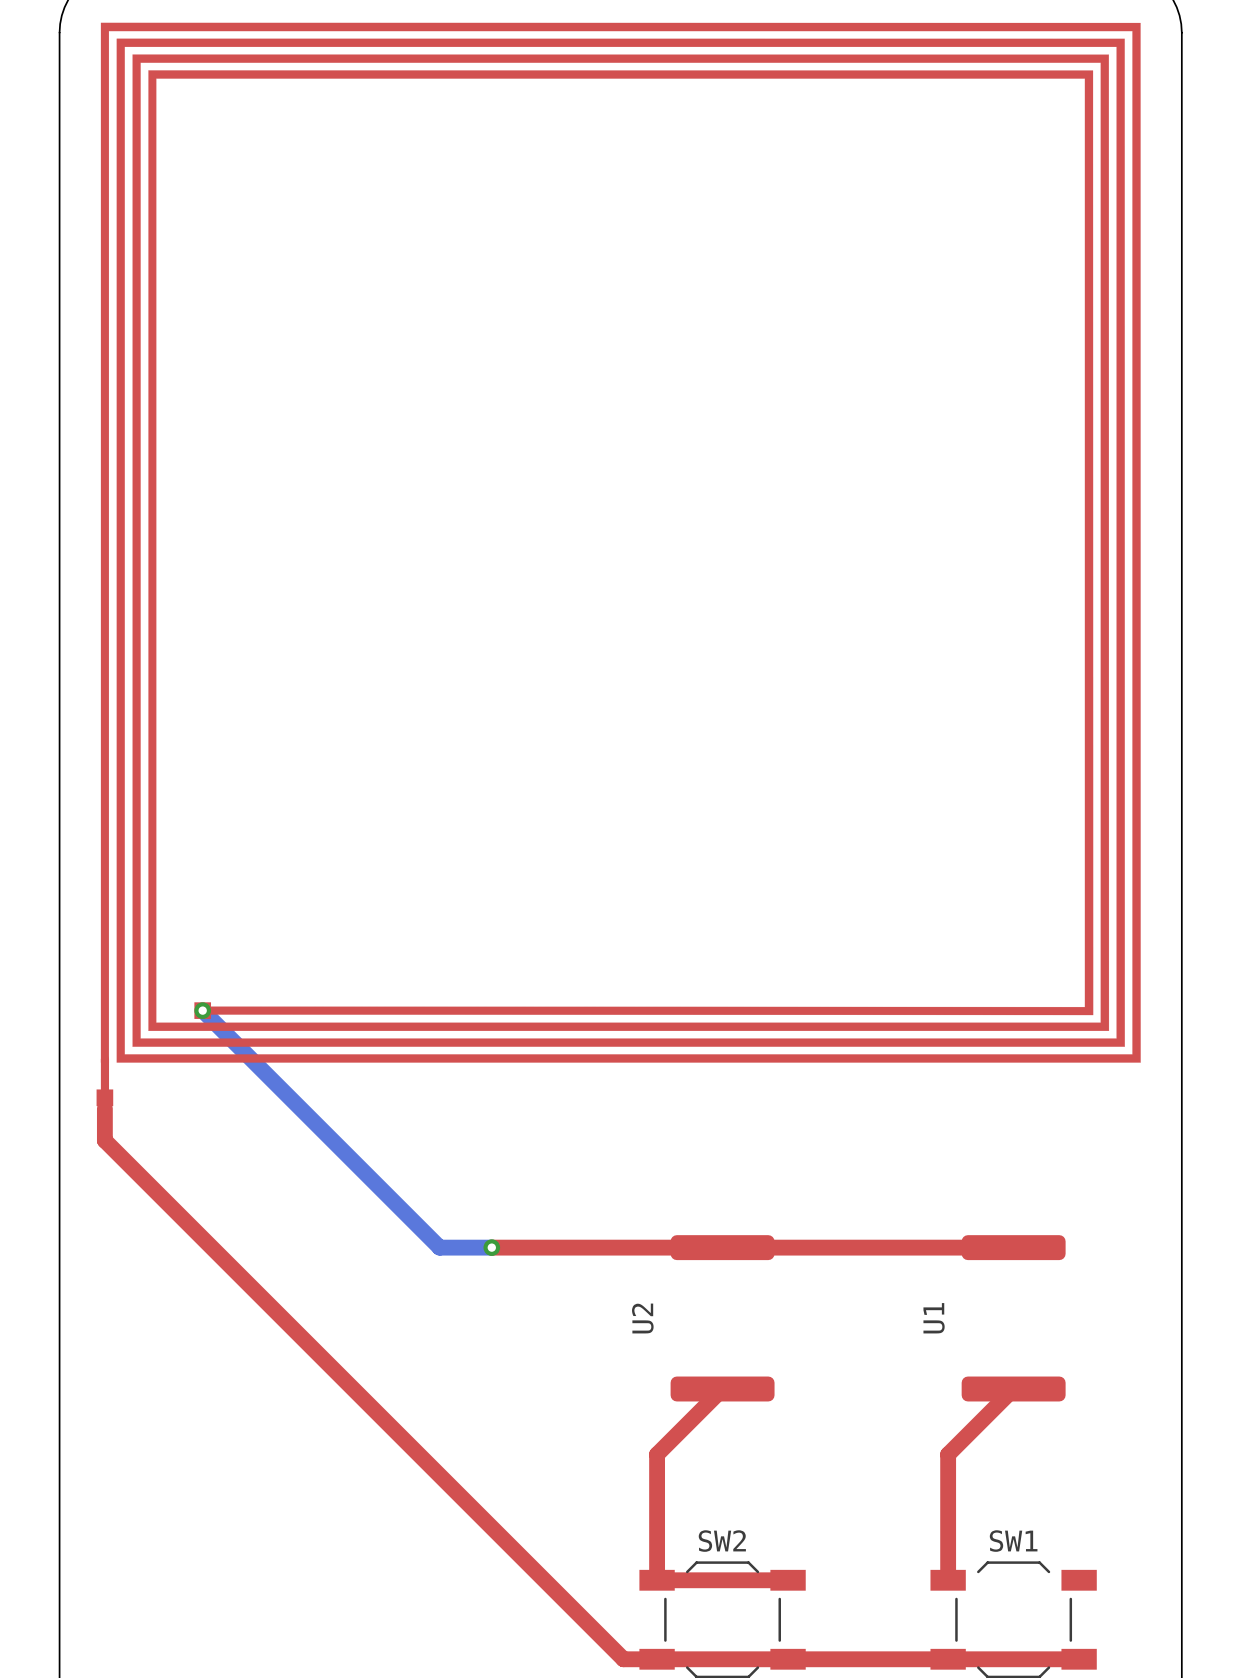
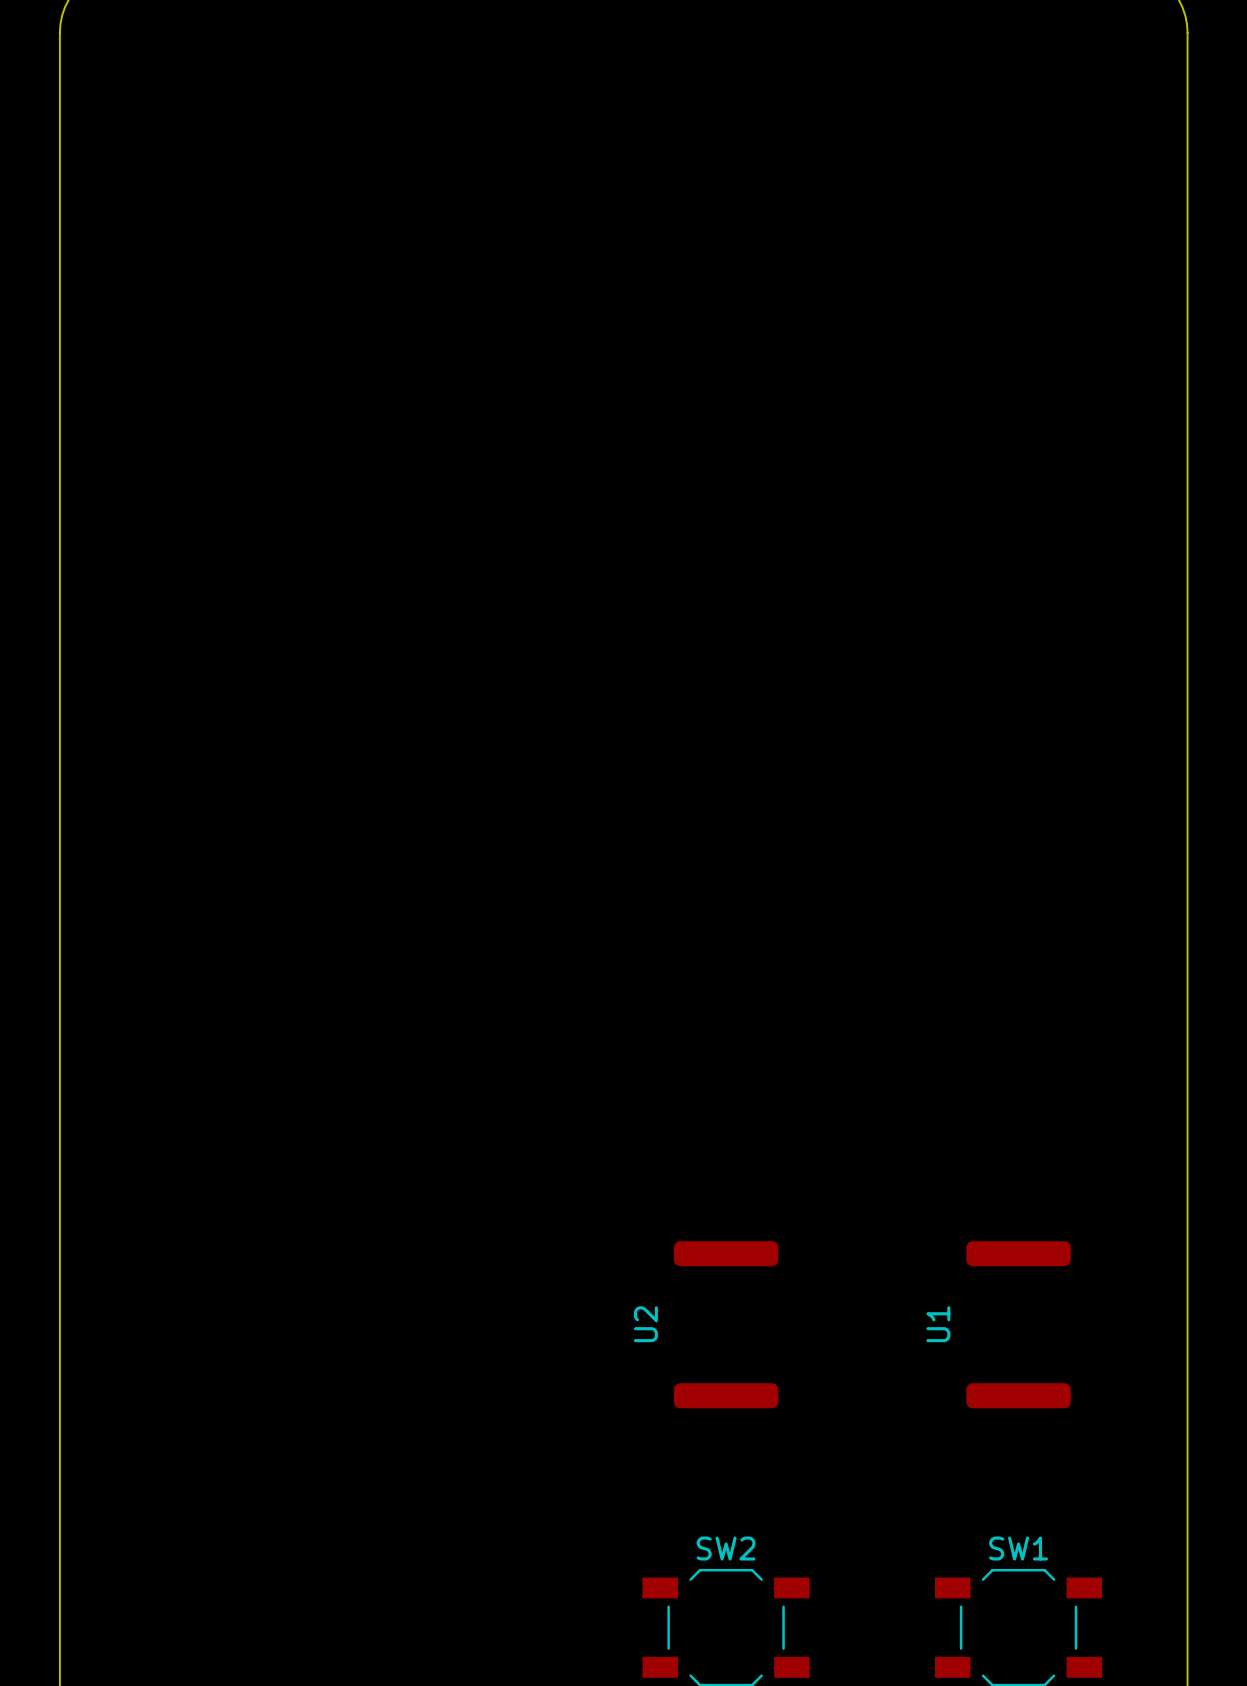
part: (618, 564) -> none
bottom track: (202, 1010) (439, 1247) (491, 1247) -> none
via: (202, 1010) -> none
top track: (104, 1108) (104, 1140) (623, 1659) (1079, 1659) -> none
top track: (491, 1247) (1013, 1247) -> none
via: (491, 1247) -> none
top track: (722, 1389) (657, 1454) (657, 1580) (788, 1580) -> none
top track: (1013, 1389) (948, 1454) (948, 1580) -> none

